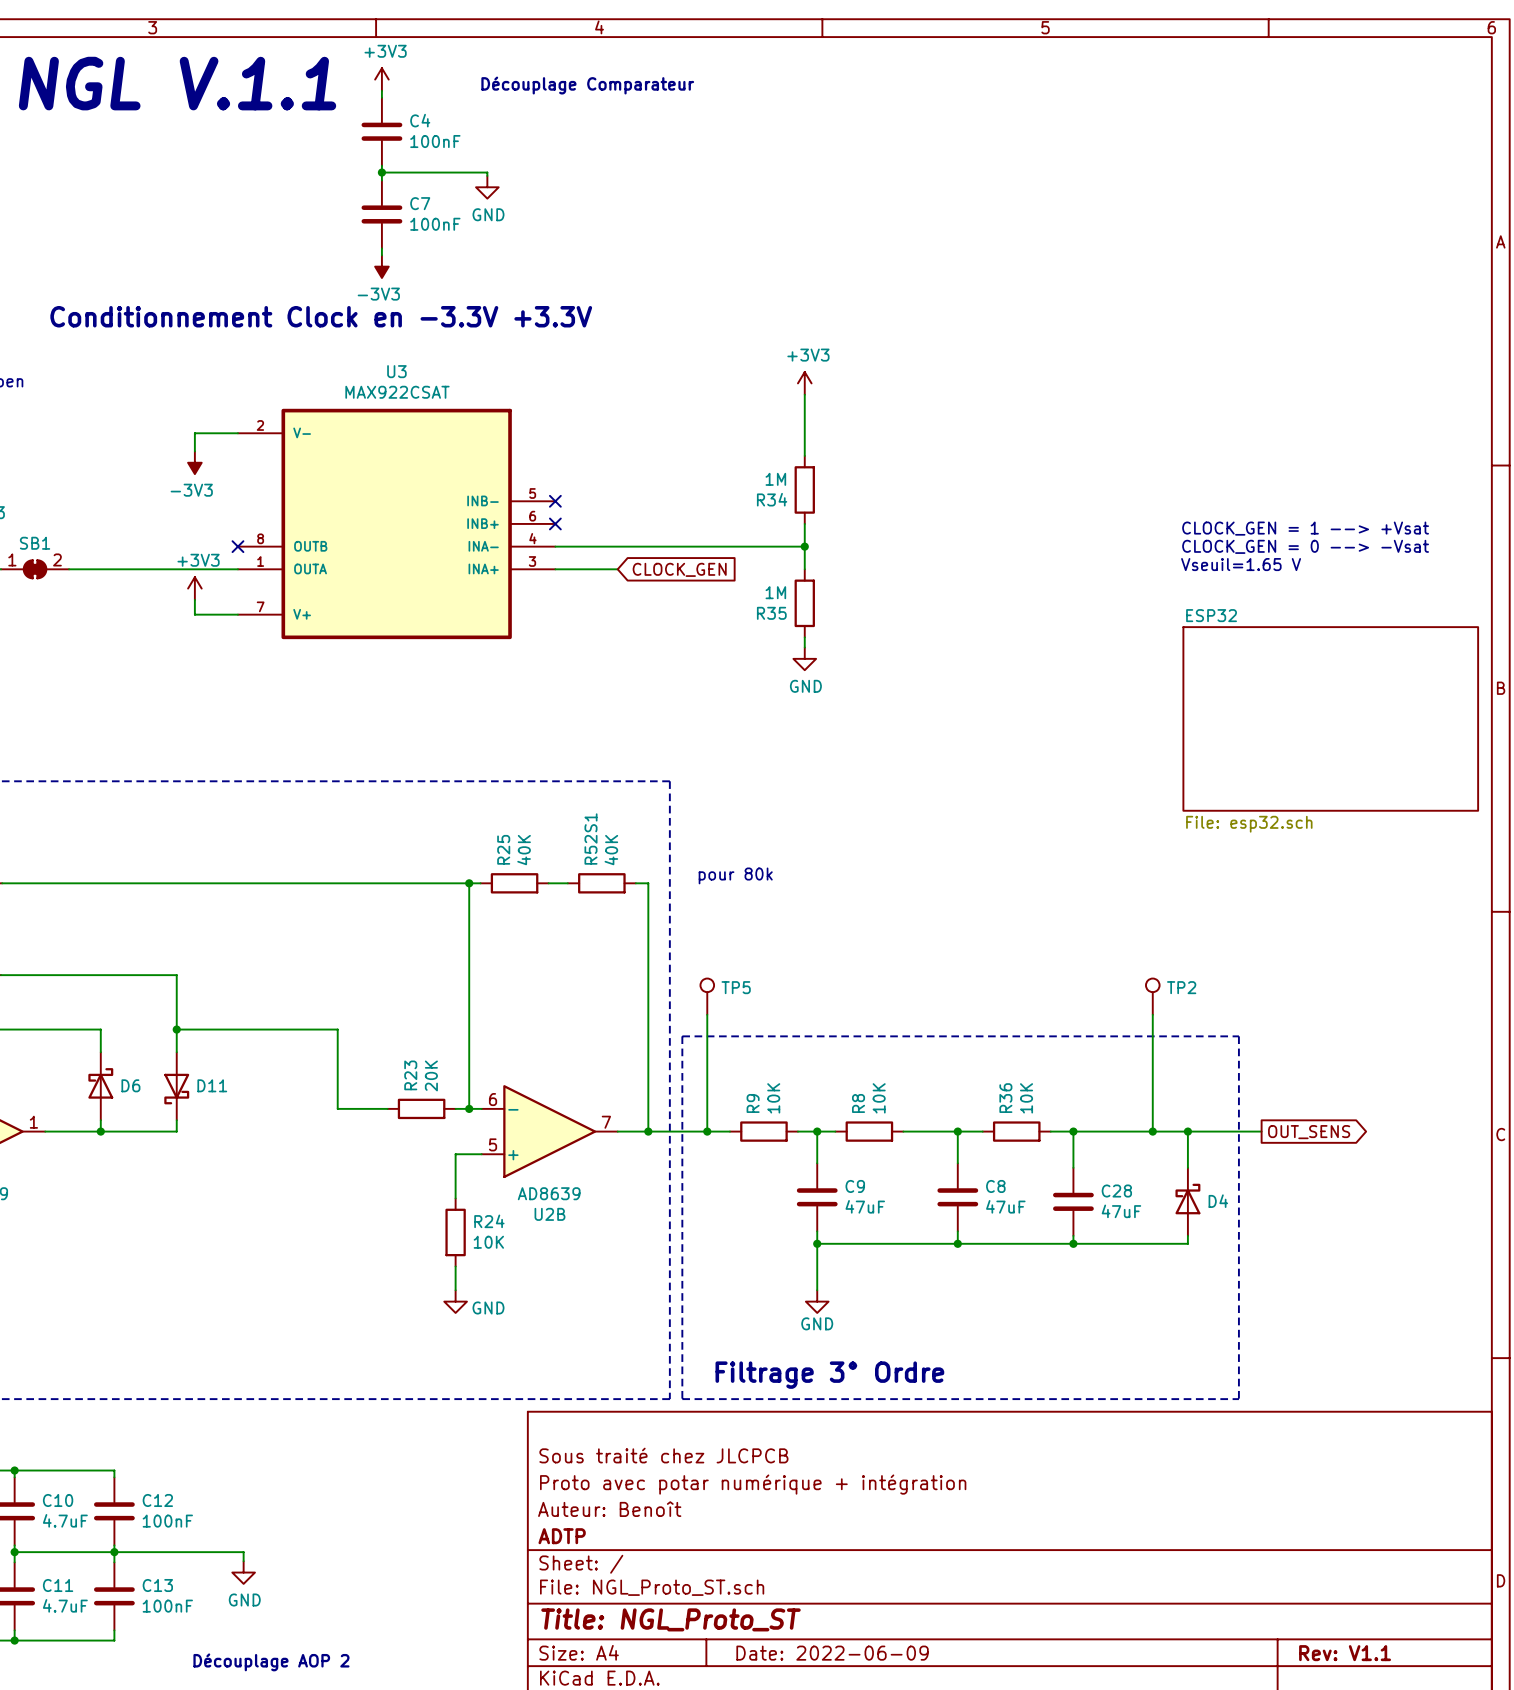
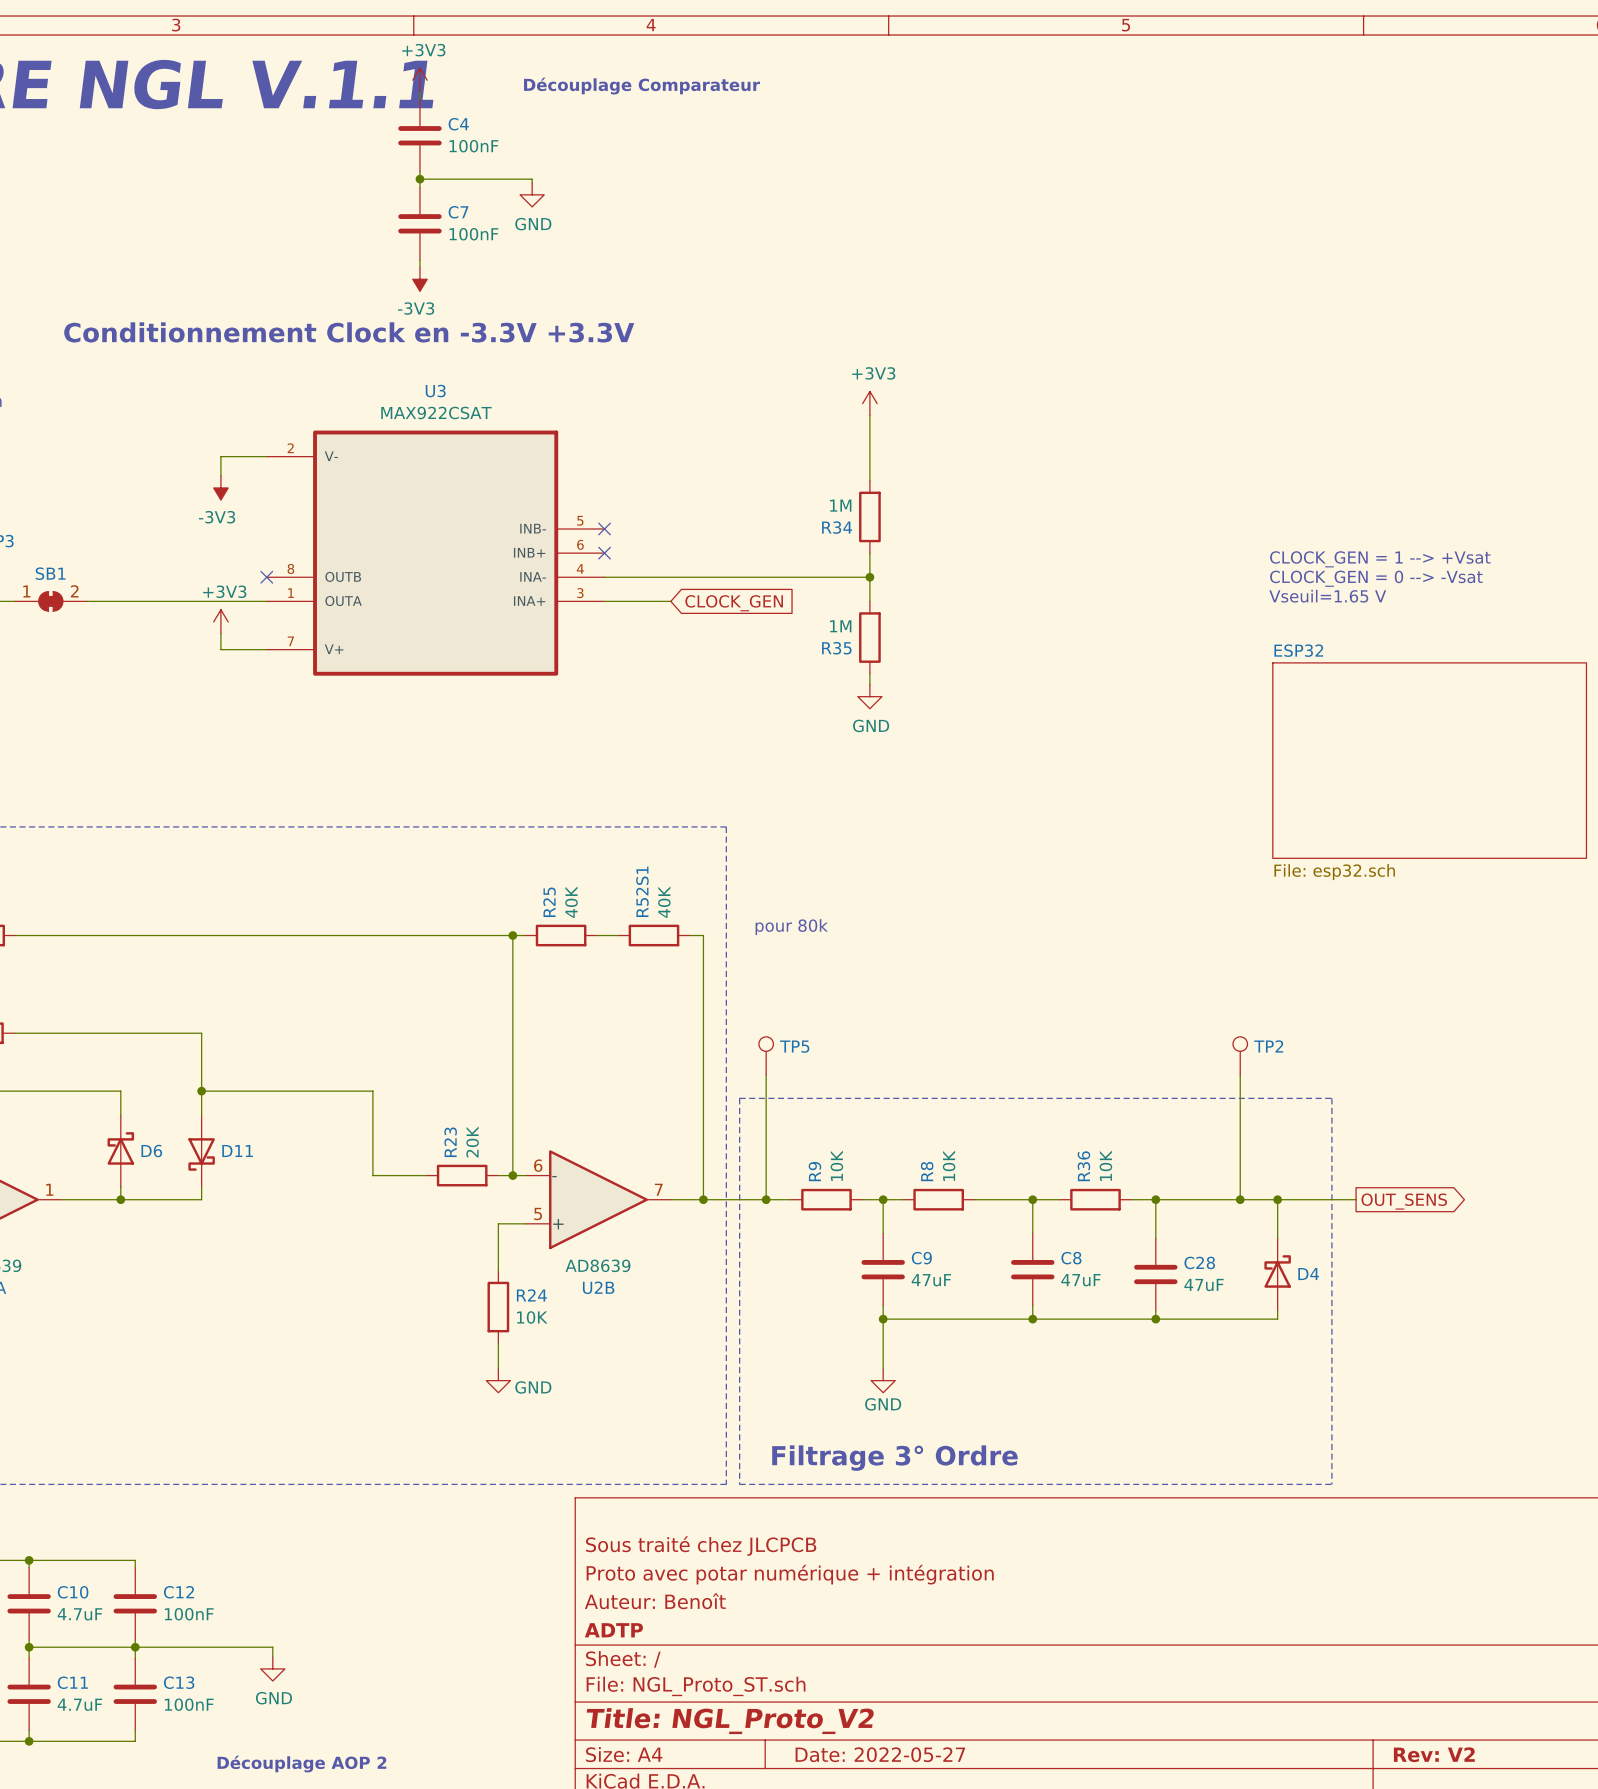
title block: Title: NGL_Proto_ST (670, 1619) -> Title: NGL_Proto_V2 (730, 1721)
title block: Date: 2022-06-09 (832, 1653) -> Date: 2022-05-27 (880, 1754)
title block: Rev: V1.1 (1345, 1653) -> Rev: V2 (1434, 1754)

